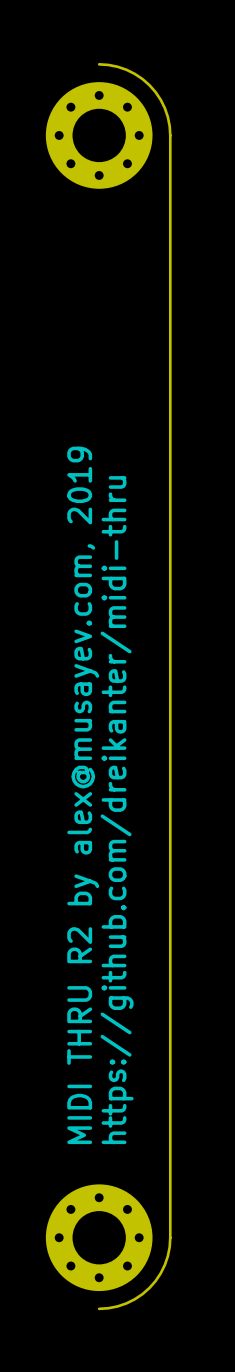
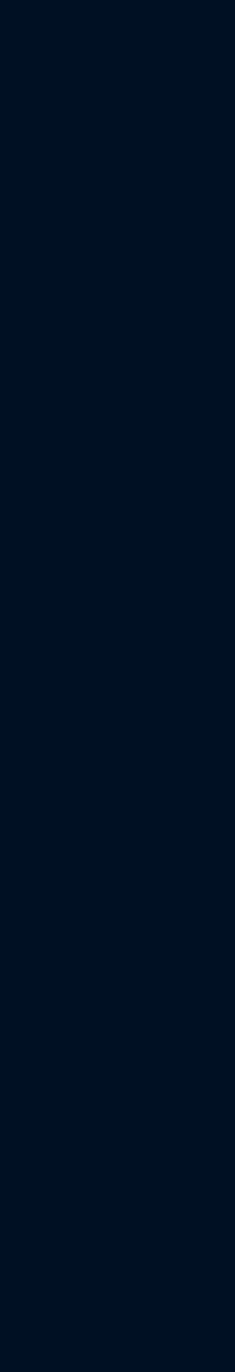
board edge: (99, 64) (126, 69) (149, 85) (164, 108) (170, 135) (170, 1237) (164, 1264) (149, 1288) (126, 1303) (99, 1308) -> none
part: (99, 135) -> none
text: MIDI THRU R2 by alex@musayev.com, 2019 (83, 795) -> none
text: https://github.com/dreikanter/midi-thru (117, 810) -> none
part: (99, 1237) -> none

